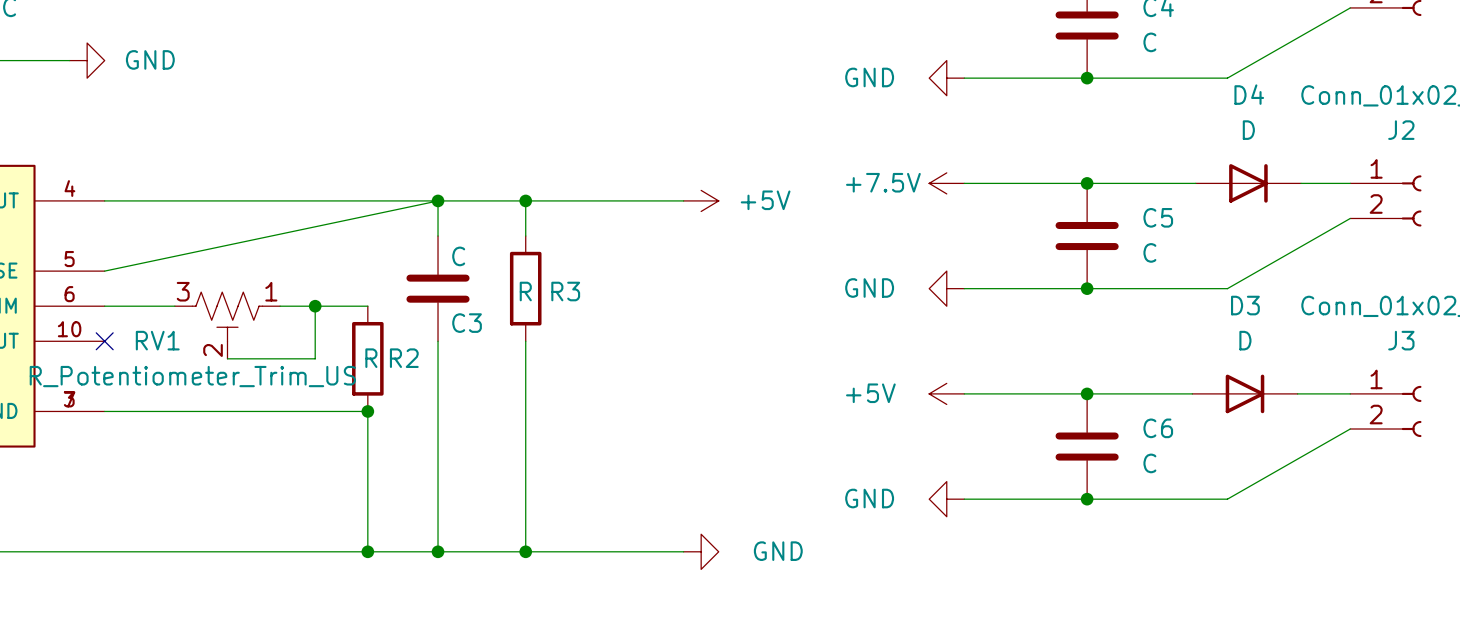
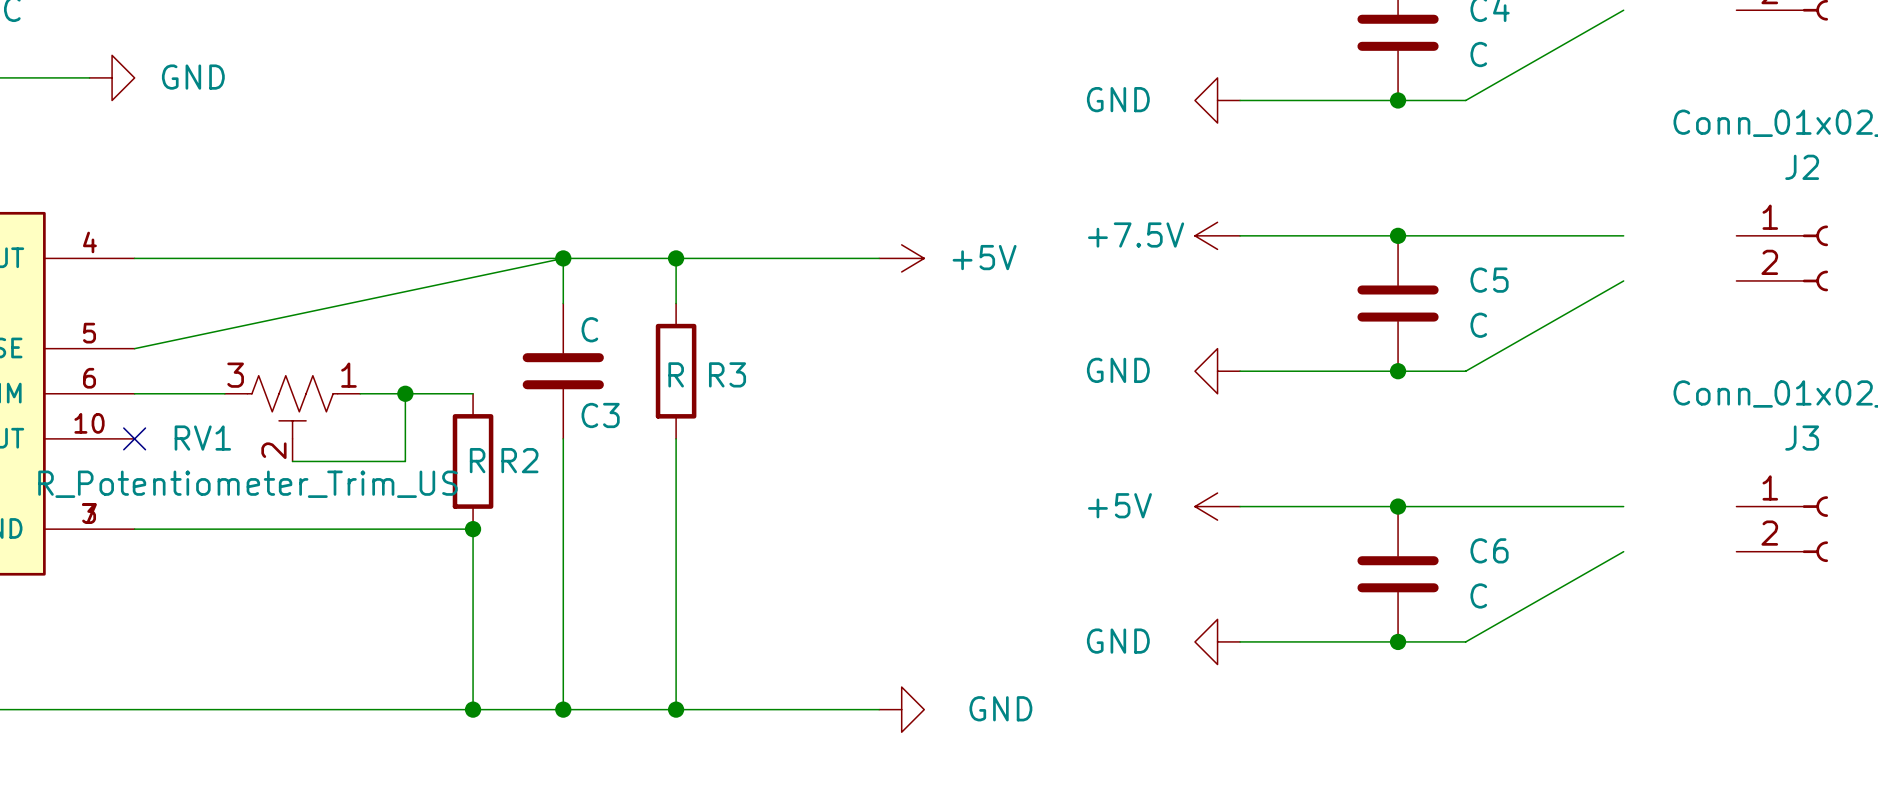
wire: (1350, 7) (1227, 78) (1139, 78) -> (1623, 10) (1465, 100)
D4: D (1248, 183) -> none
wire: (1301, 183) (1350, 183) -> none
wire: (1350, 218) (1227, 288) (1139, 288) -> (1623, 280) (1465, 371)
D3: D (1245, 393) -> none
wire: (1297, 393) (1350, 393) -> none
wire: (1350, 429) (1227, 499) (1139, 499) -> (1623, 551) (1465, 641)

